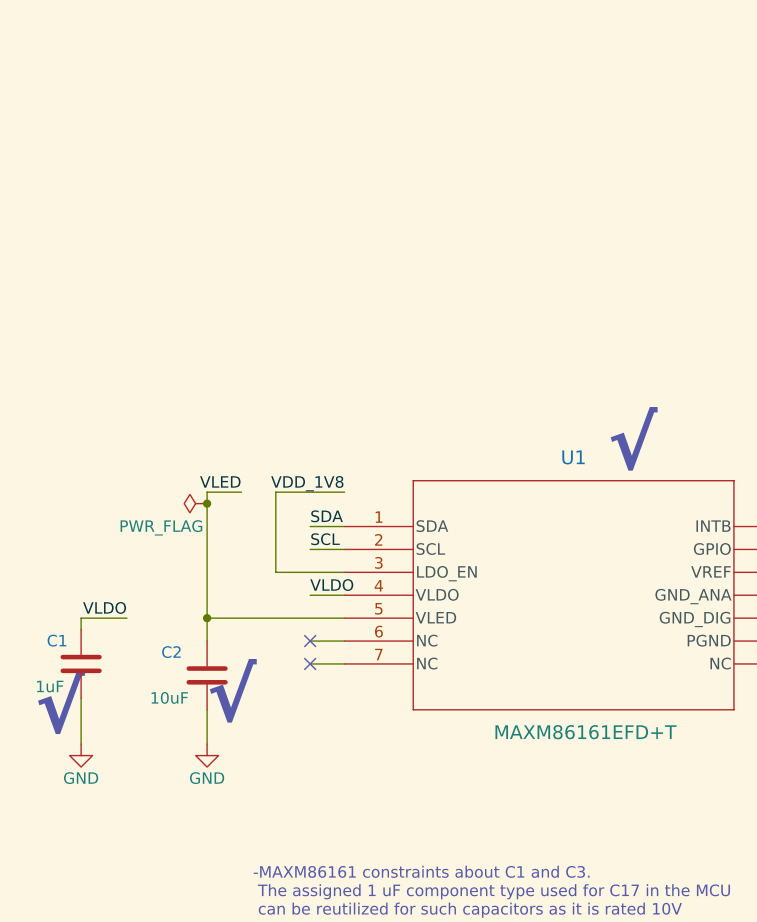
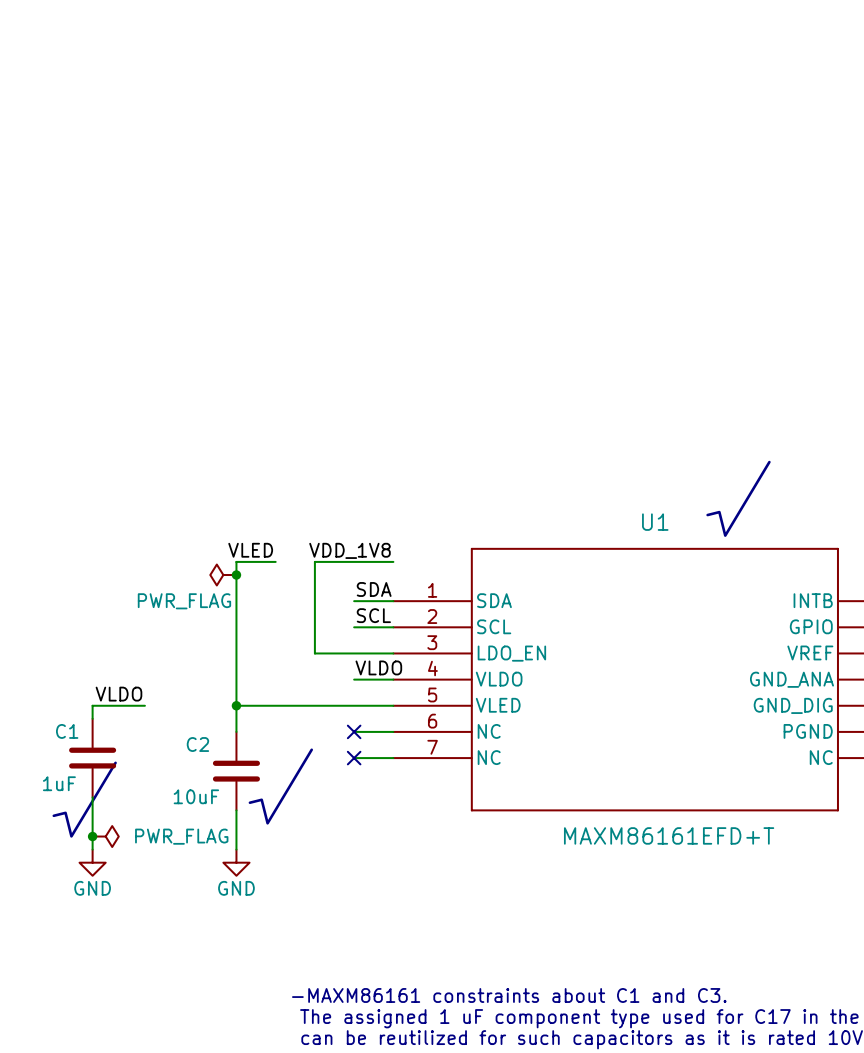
junction: none -> (92, 836)
power symbol: none -> PWR_FLAG (105, 836)

